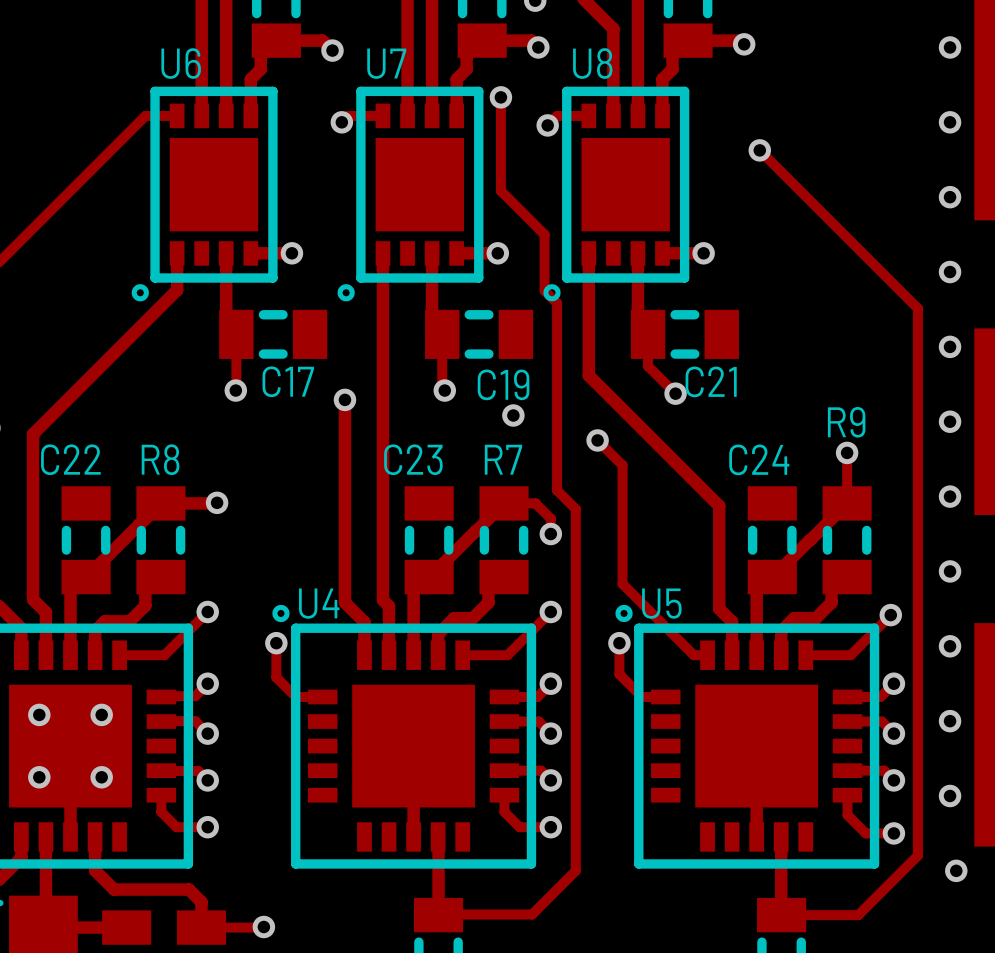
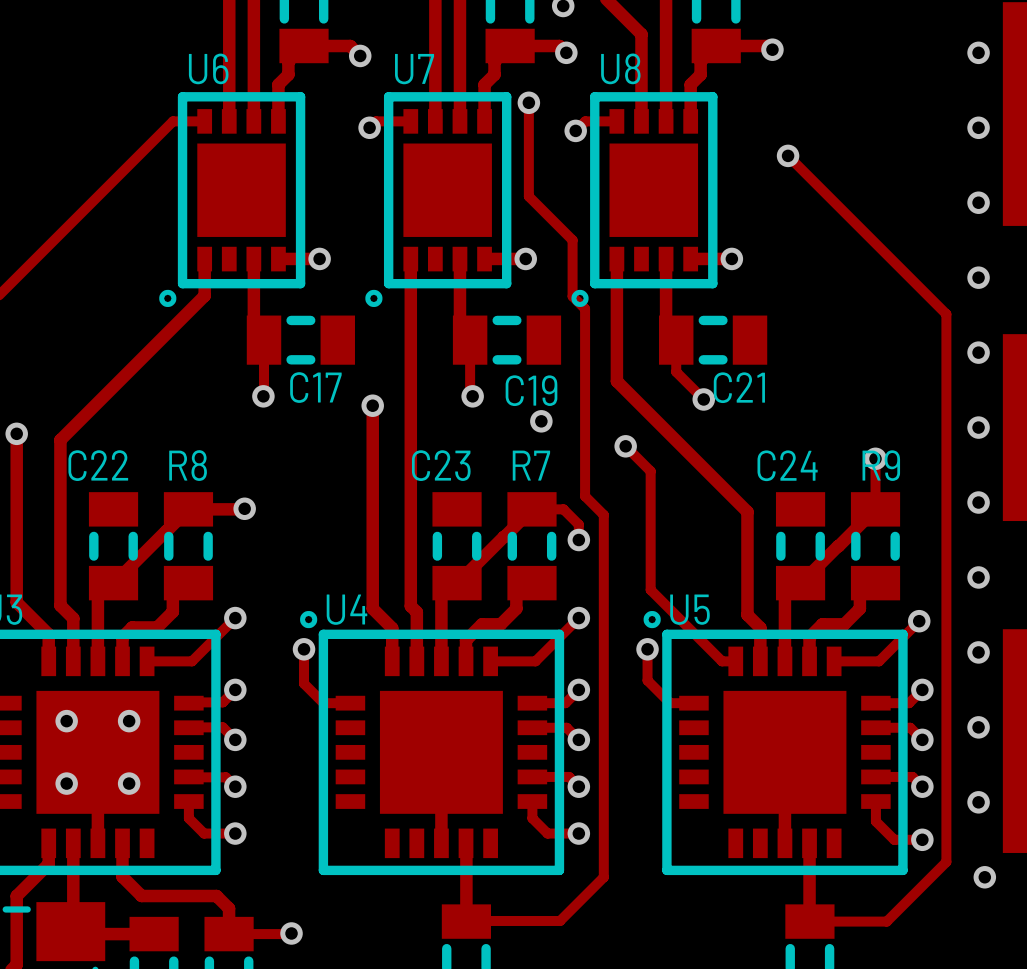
R9 name position: R9 (846, 422) -> R9 (881, 465)

